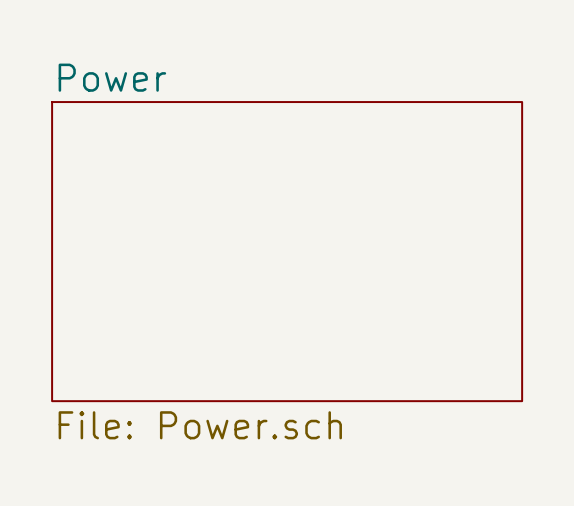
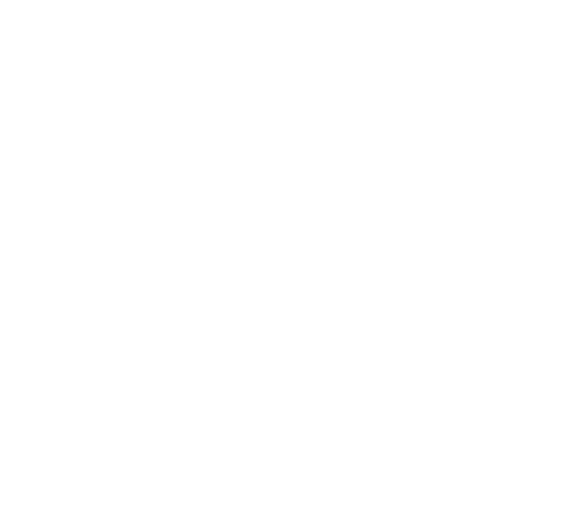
sheet Power: File: Power.sch (287, 251) -> none

